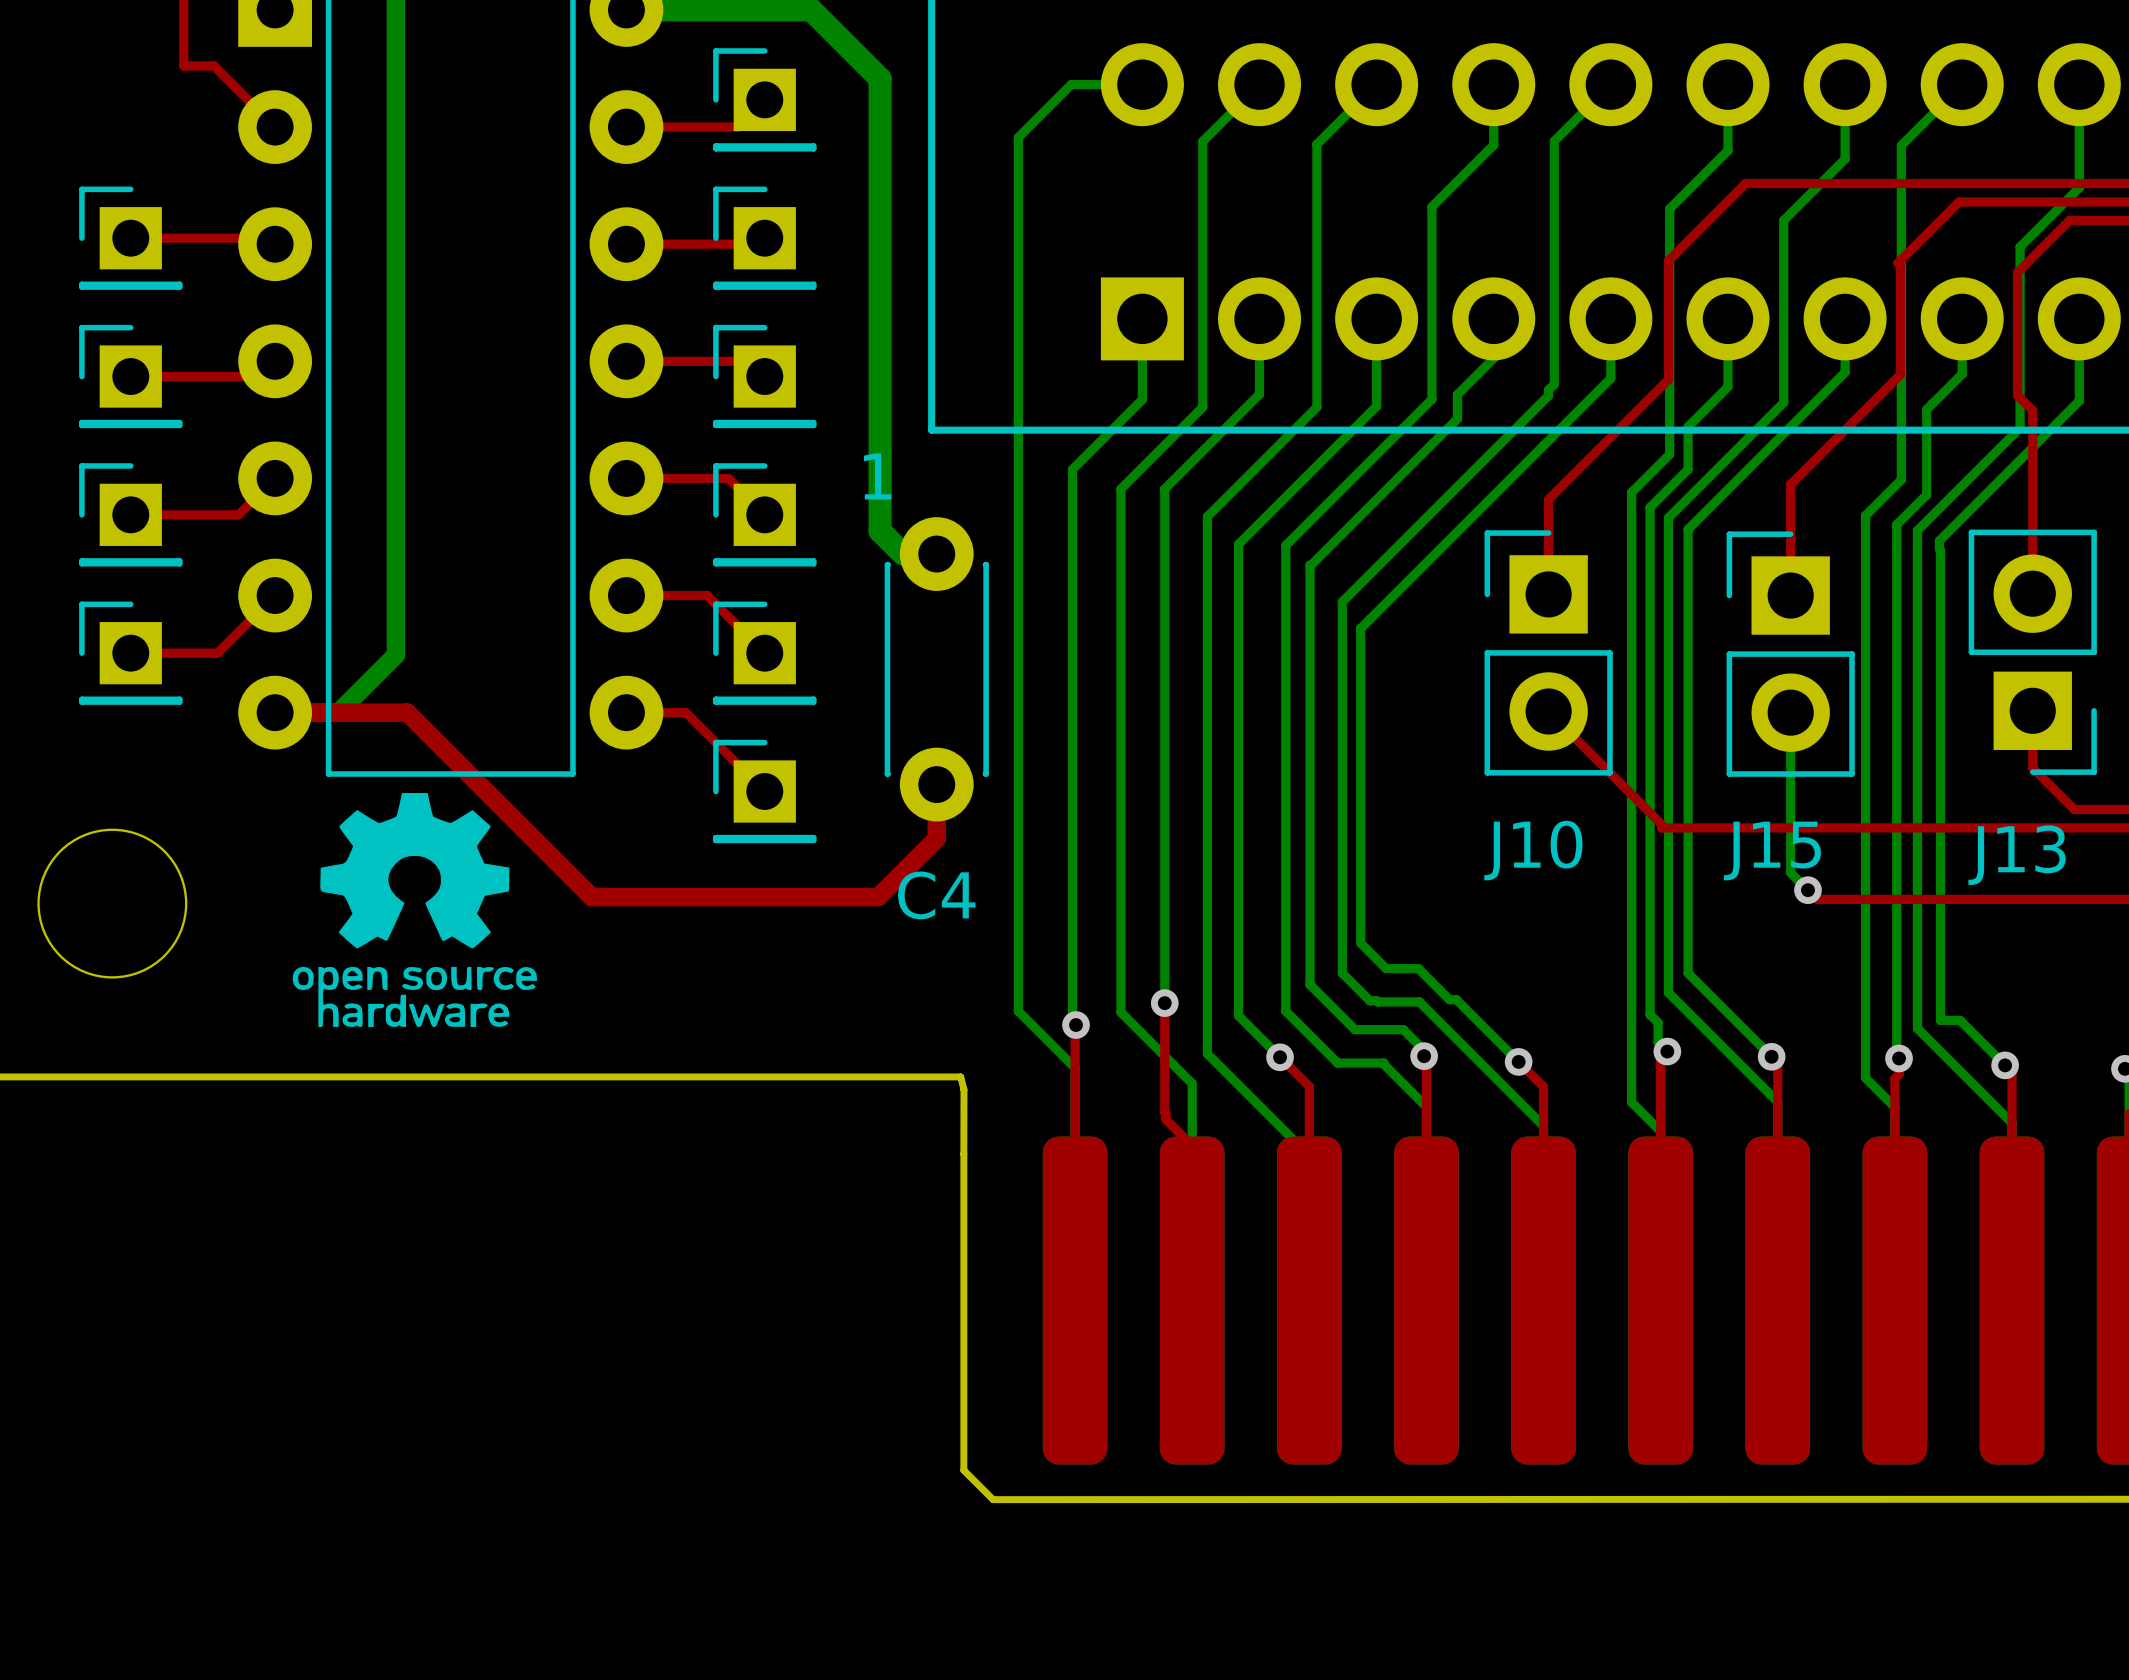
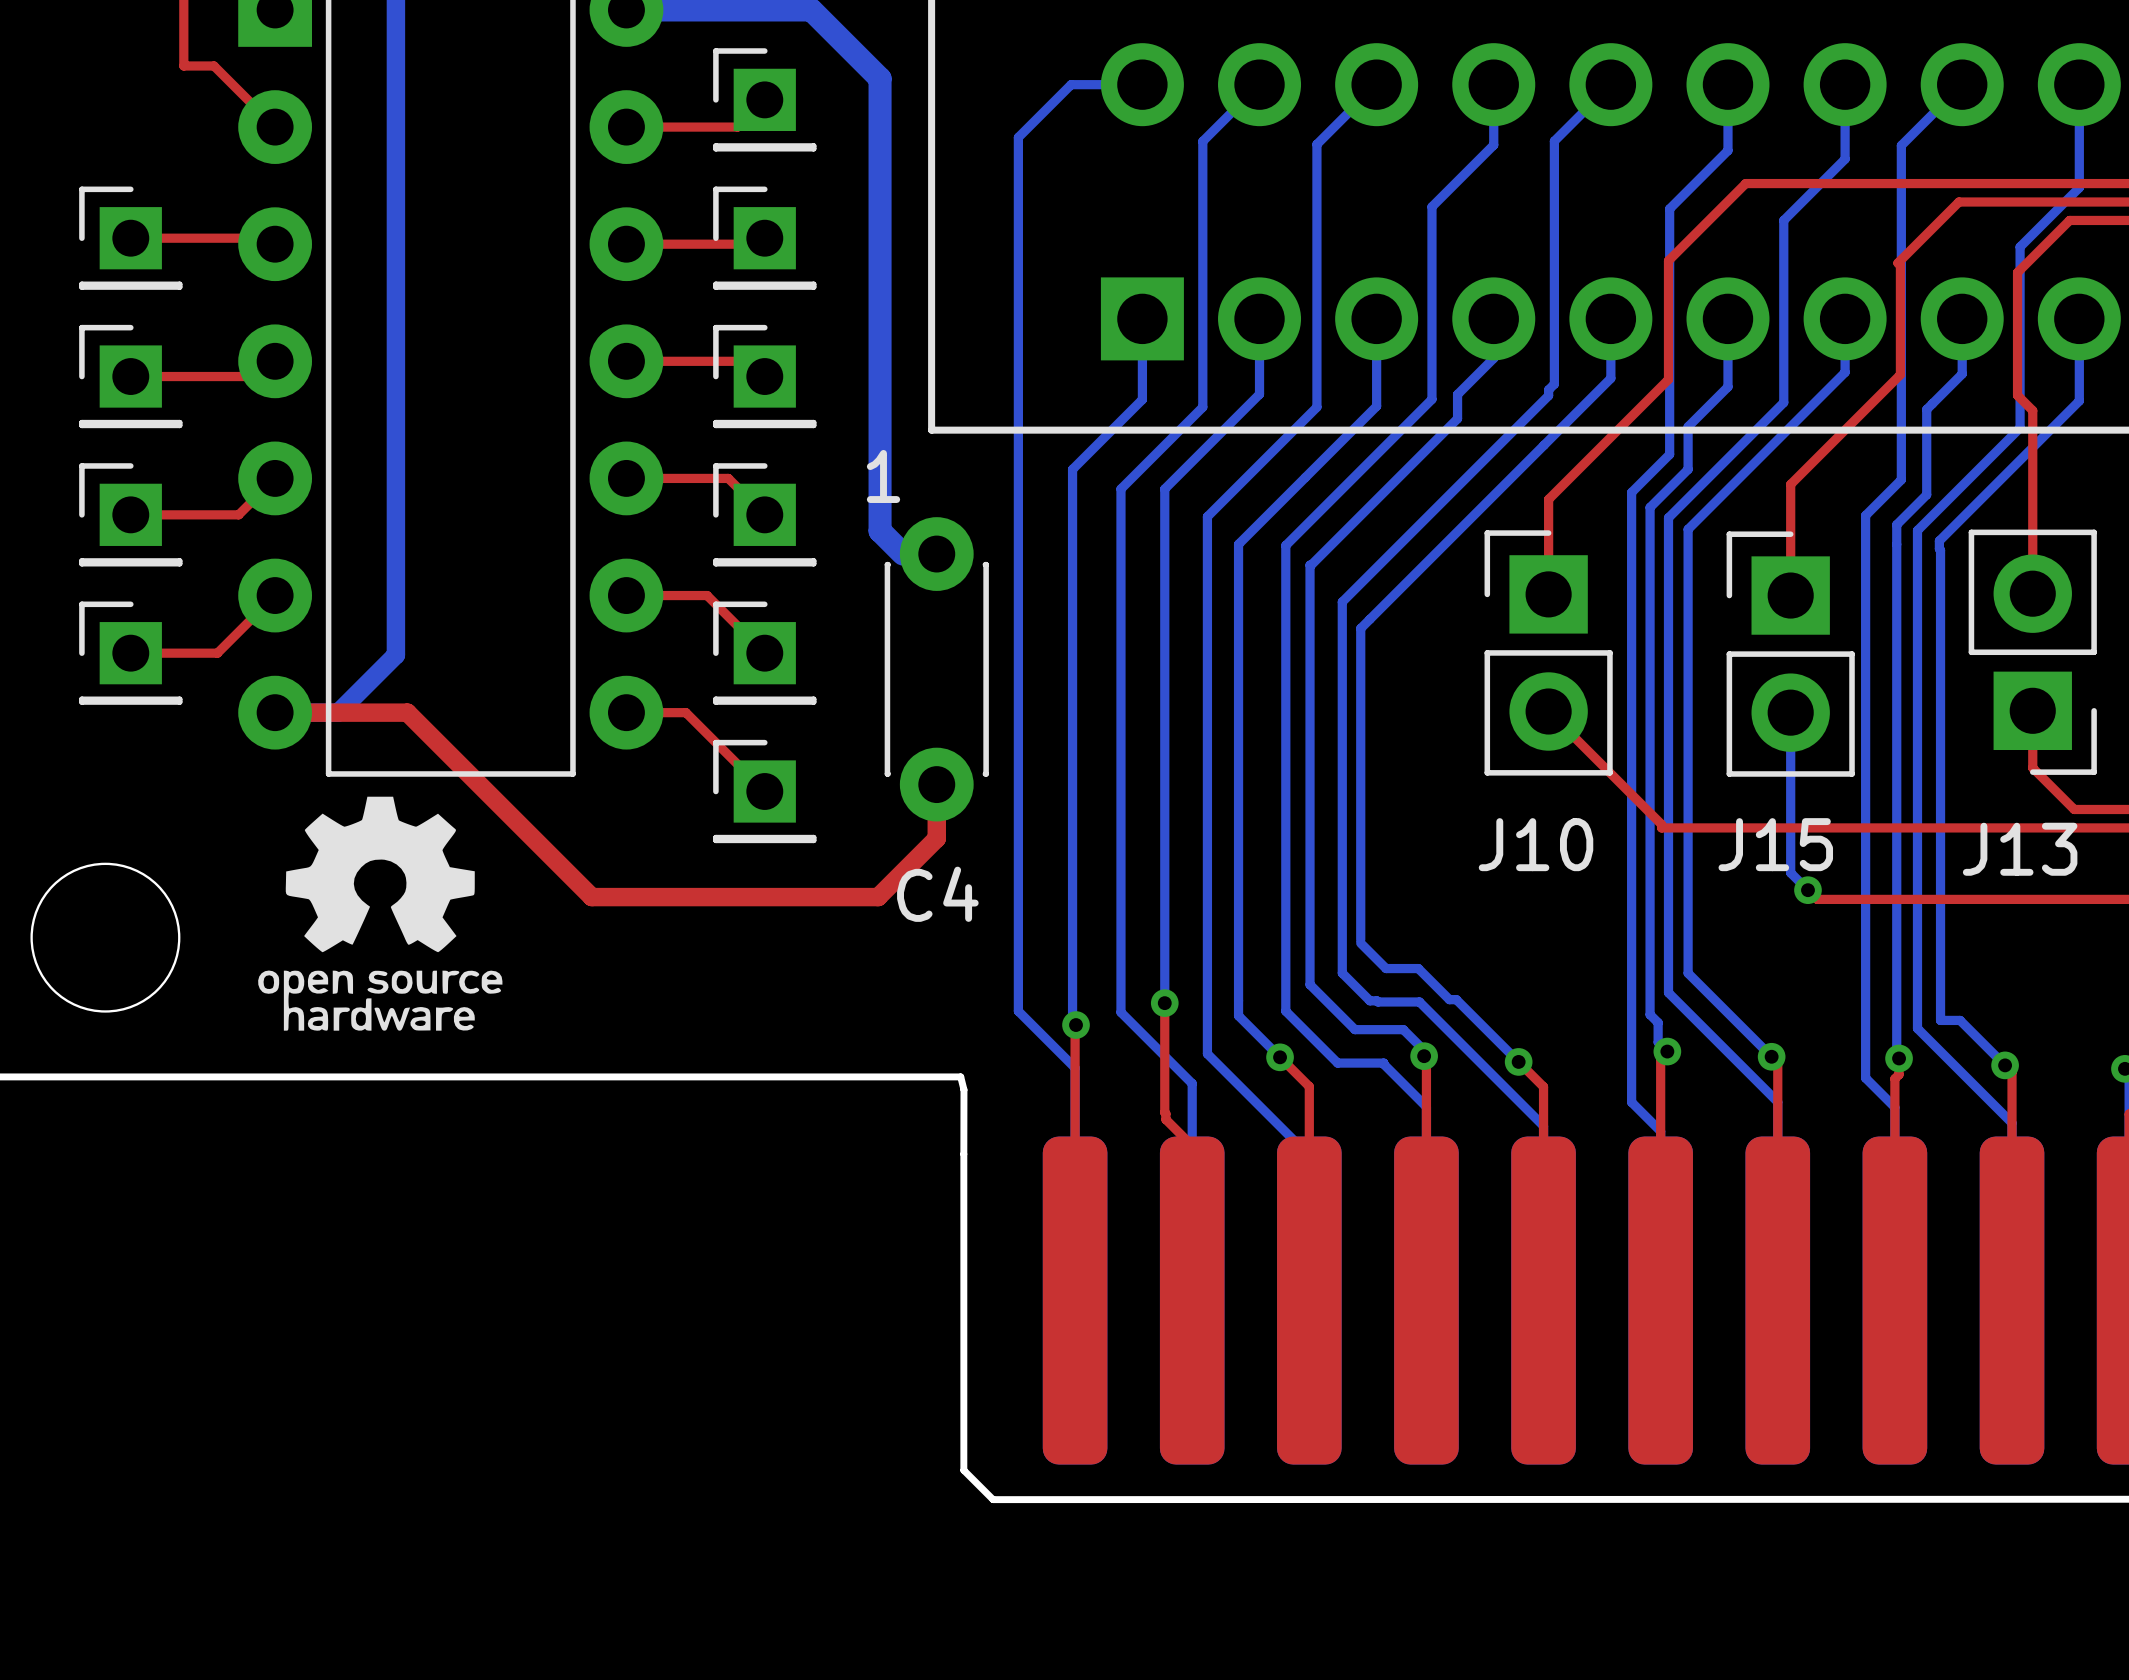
round board edge position: (112, 903) -> (105, 937)
drawing position: (414, 910) -> (380, 913)

